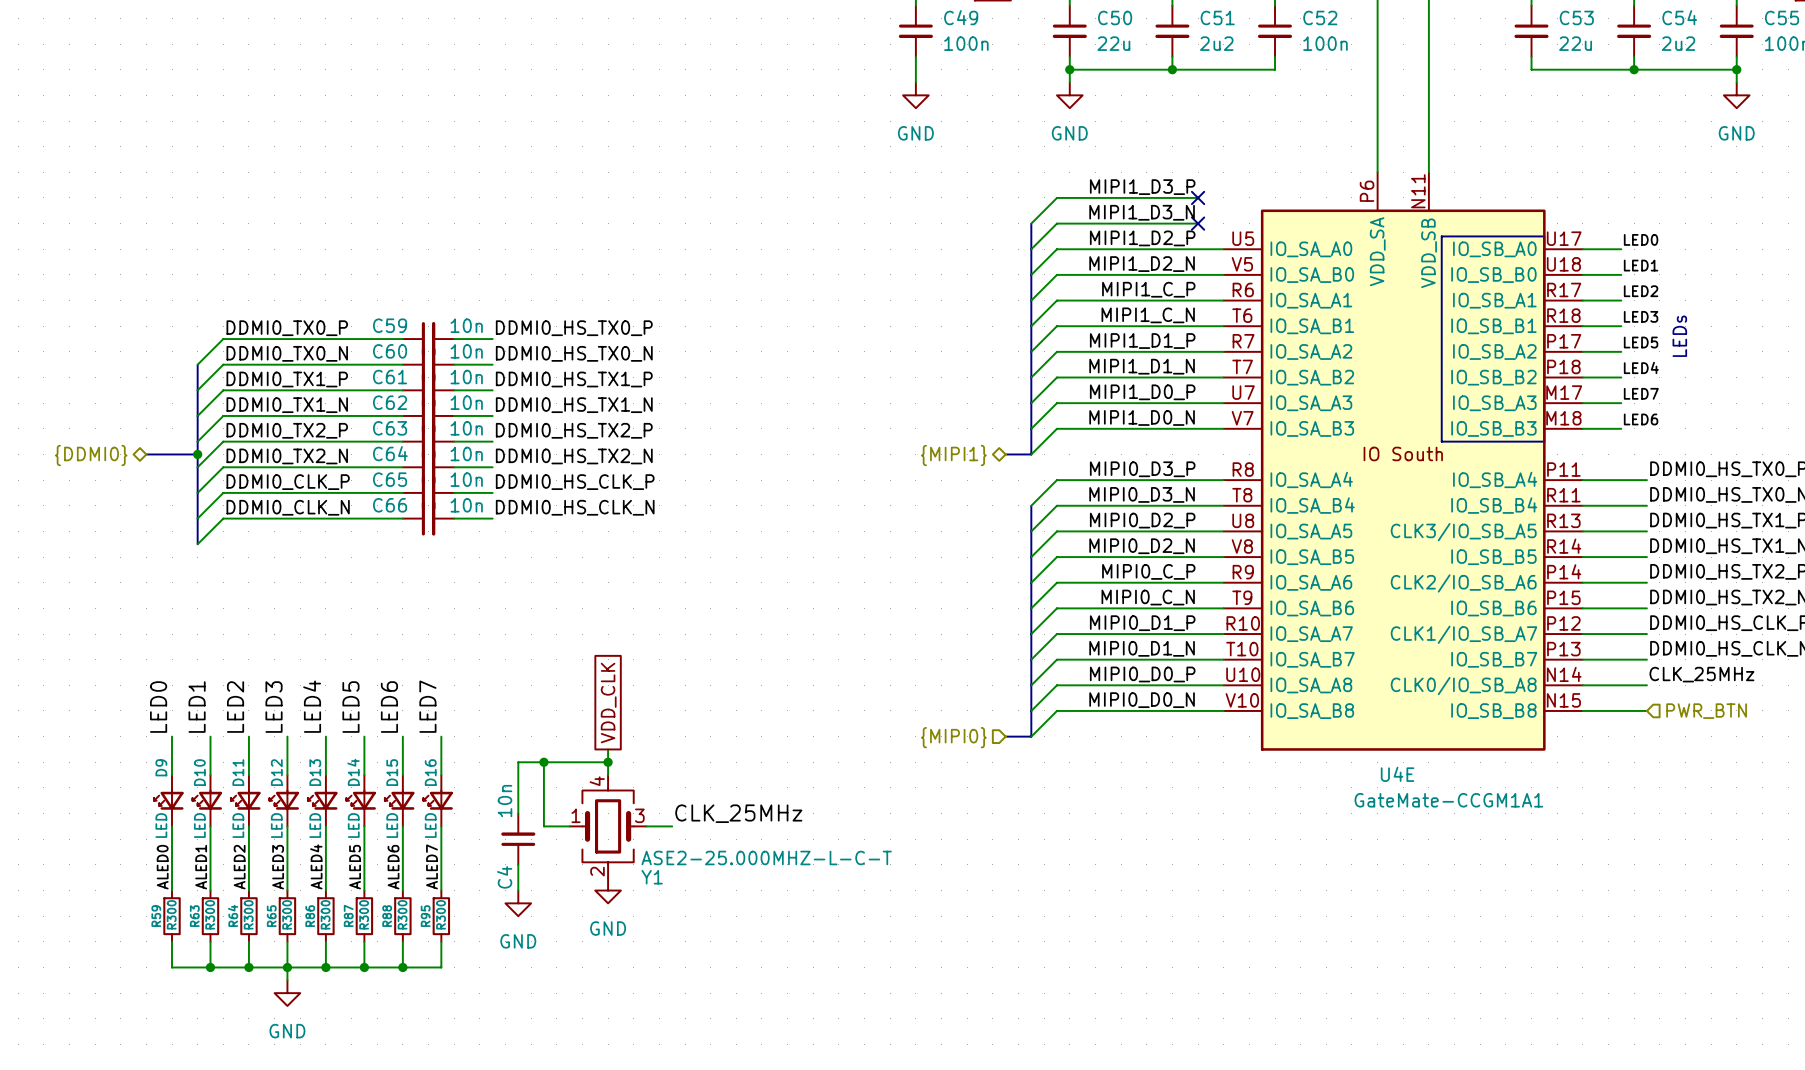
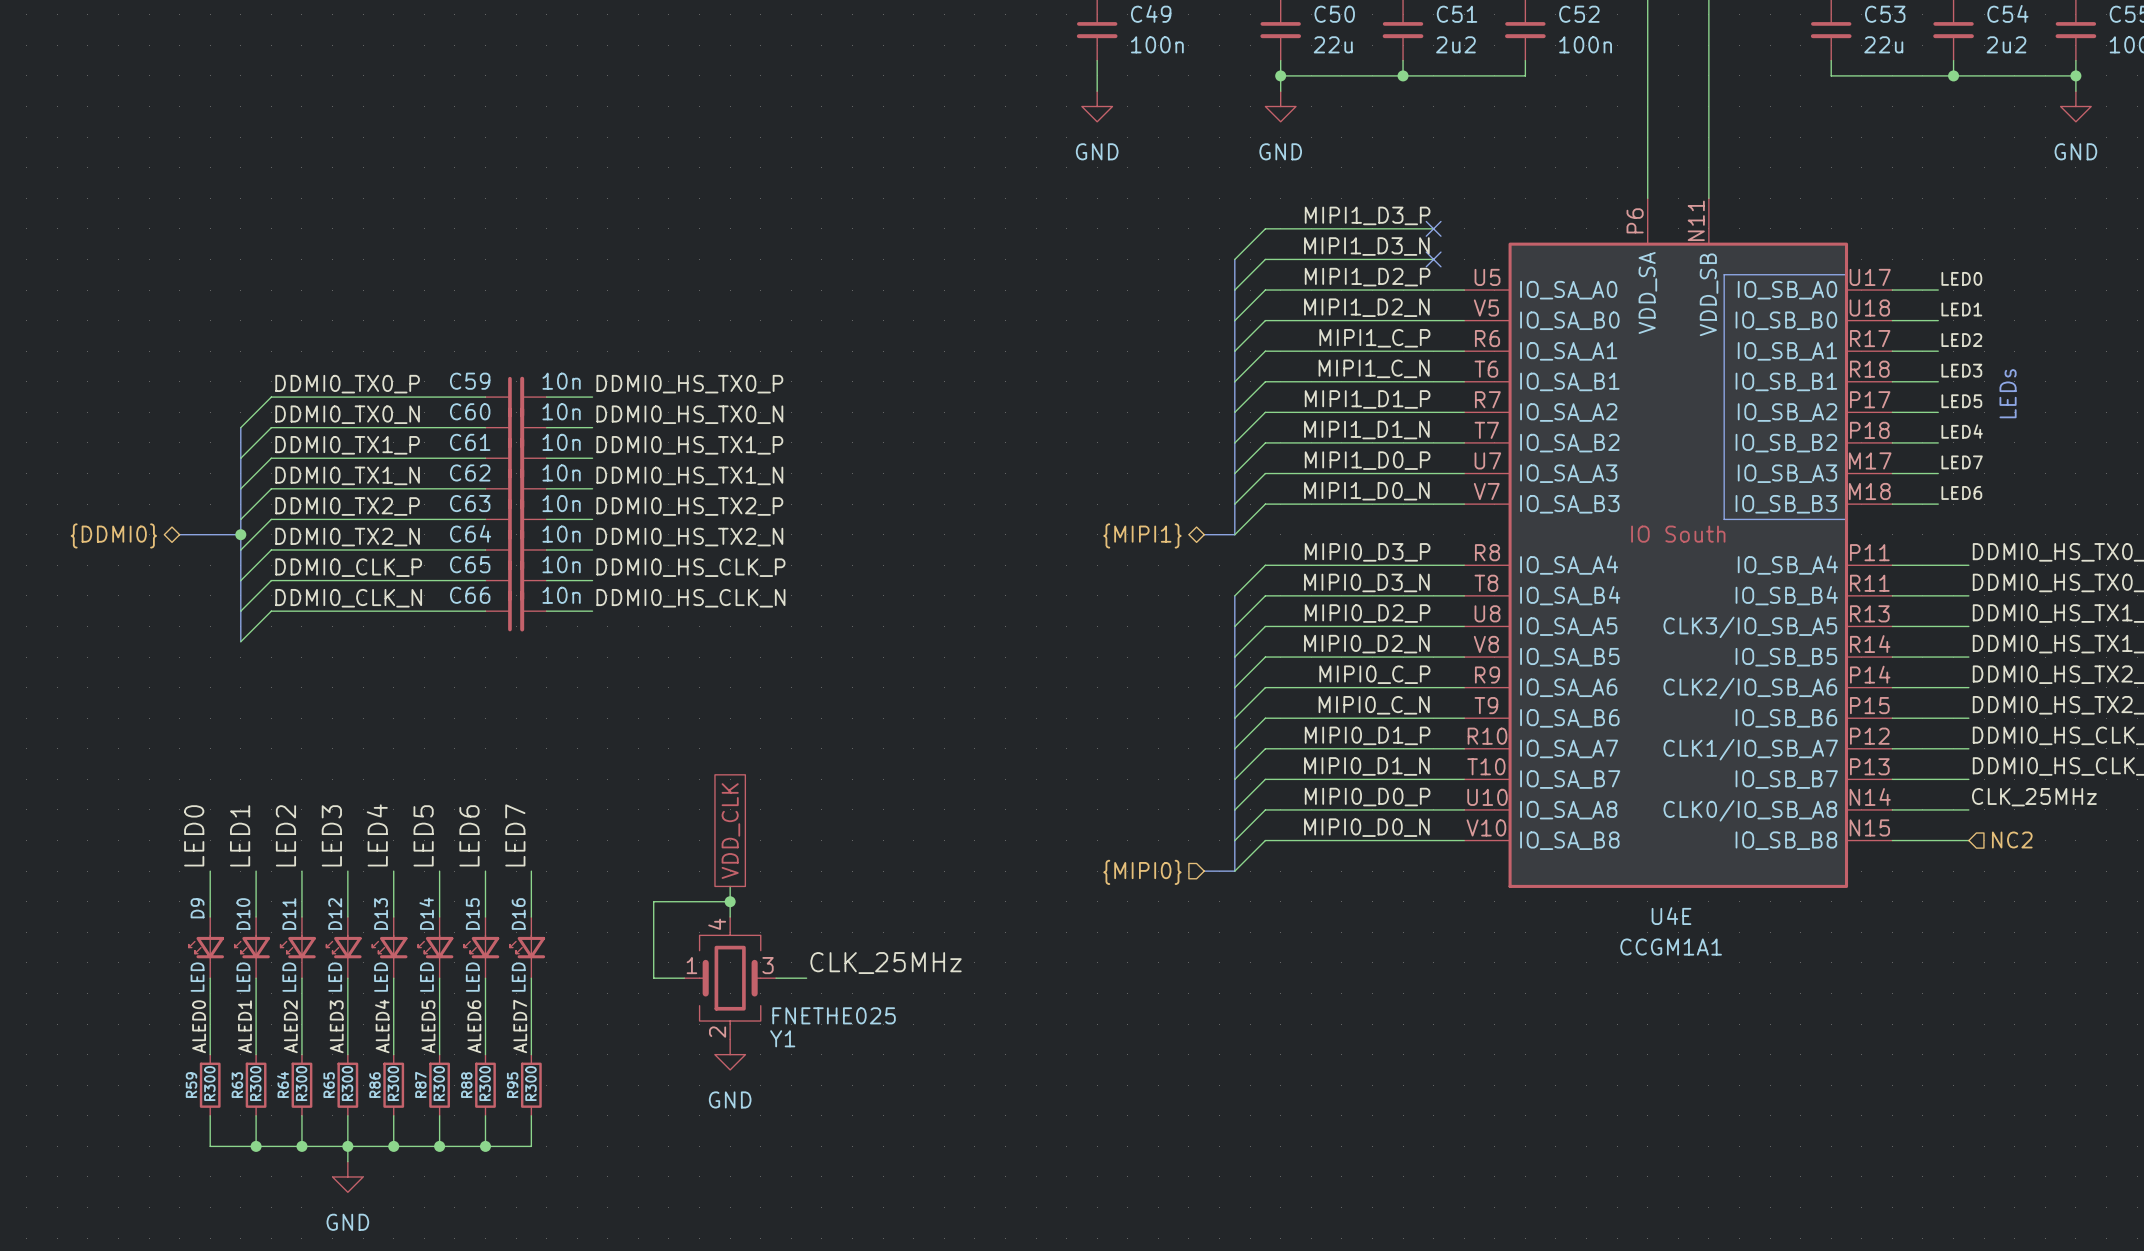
hierarchical label: PWR_BTN (1706, 711) -> NC2 (2012, 839)
wire: (543, 762) (518, 762) (518, 813) -> none
junction: (543, 762) -> none
U4E value: GateMate-CCGM1A1 (1448, 800) -> CCGM1A1 (1671, 947)
C4: 10n (518, 839) -> none
Y1 value: ASE2-25.000MHZ-L-C-T (766, 857) -> FNETHE025 (834, 1015)
wire: (518, 864) (518, 890) -> none
power symbol: GND (518, 903) -> none

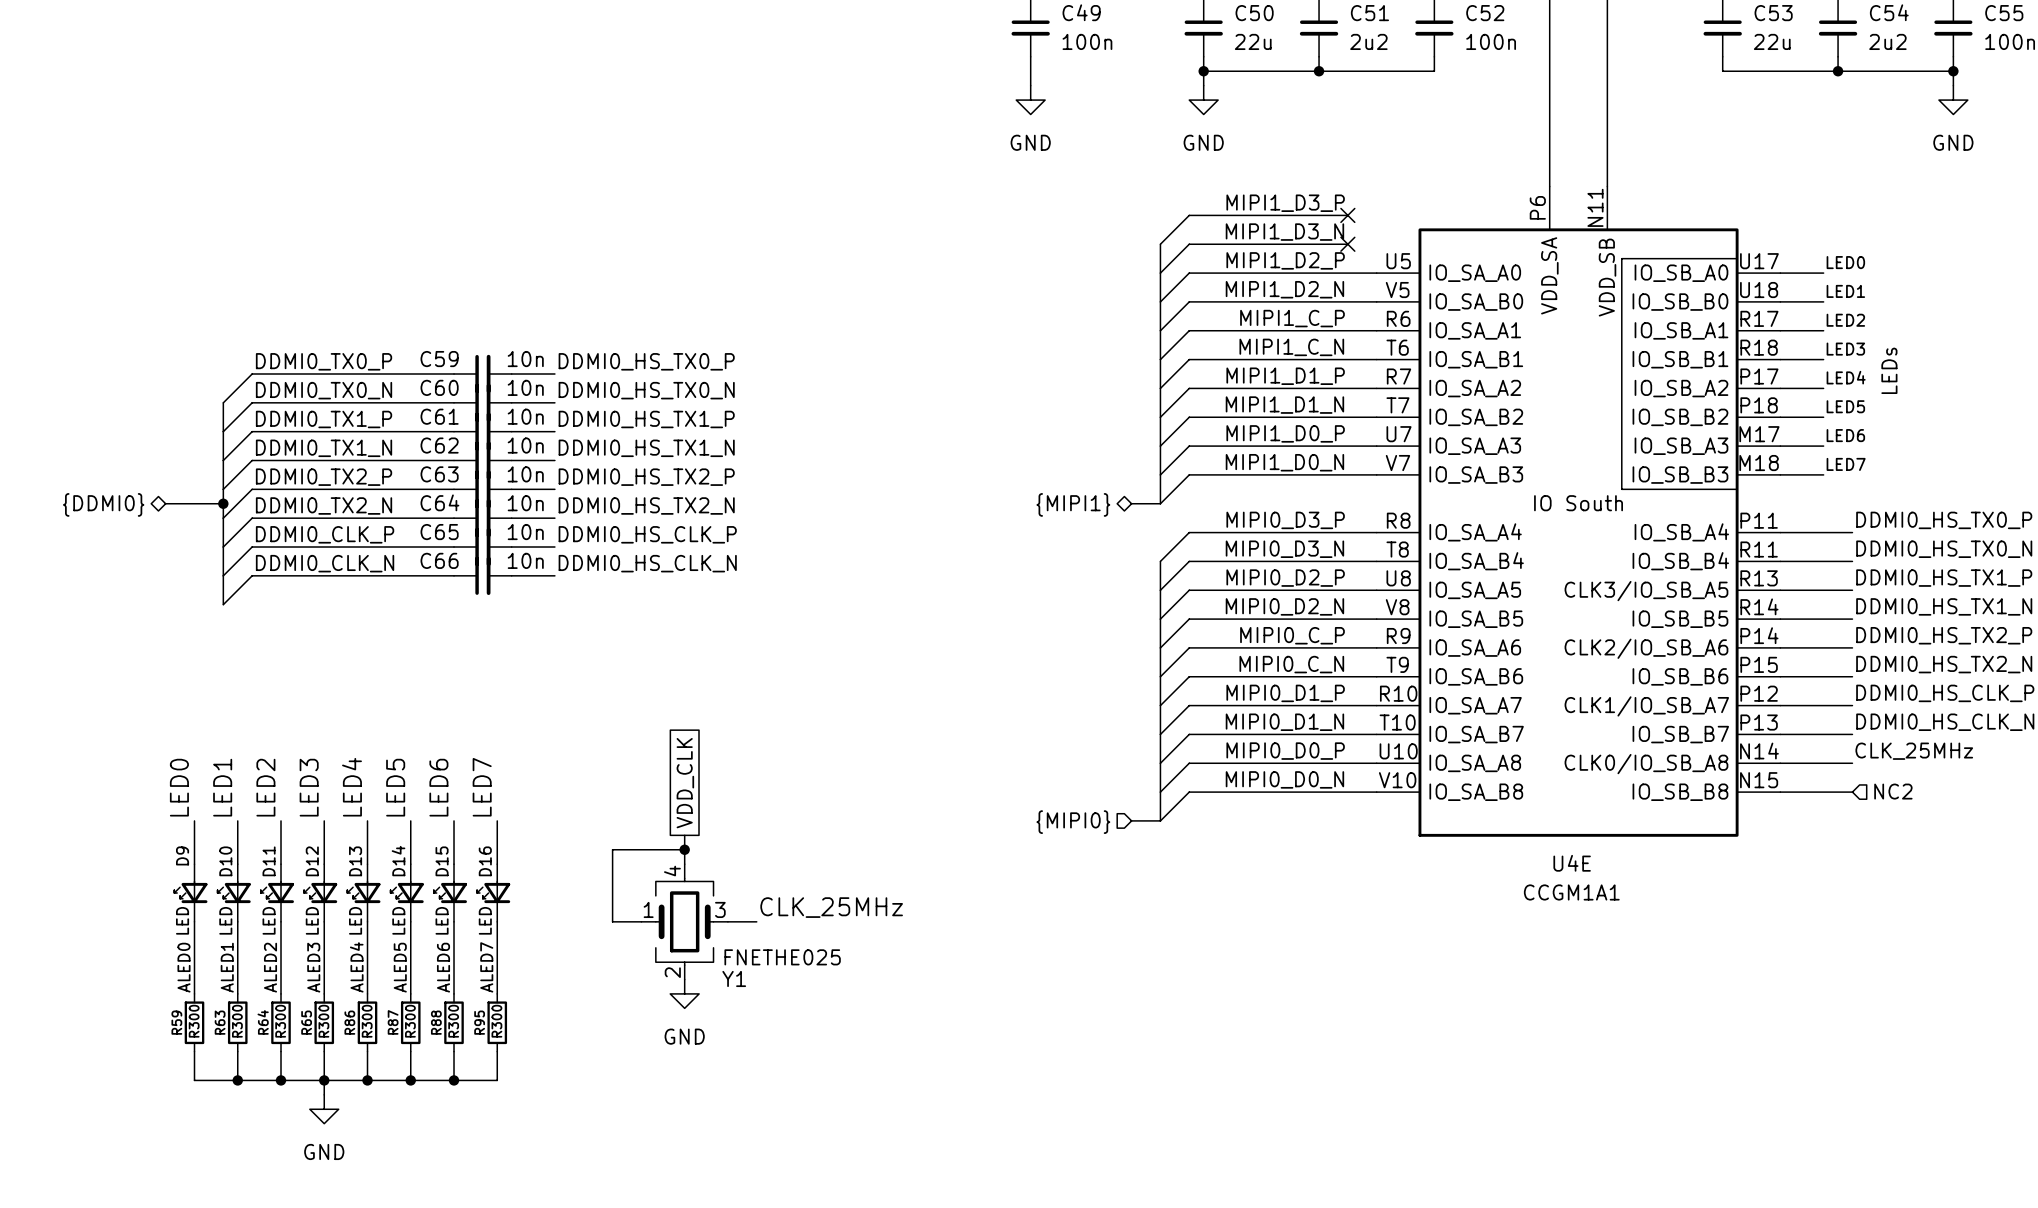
label: LED5 (1961, 401) -> LED4 (1846, 377)
label: LED4 (1962, 431) -> LED5 (1845, 406)
label: LED7 (1962, 462) -> LED6 (1845, 435)
label: LED6 (1961, 492) -> LED7 (1846, 464)

